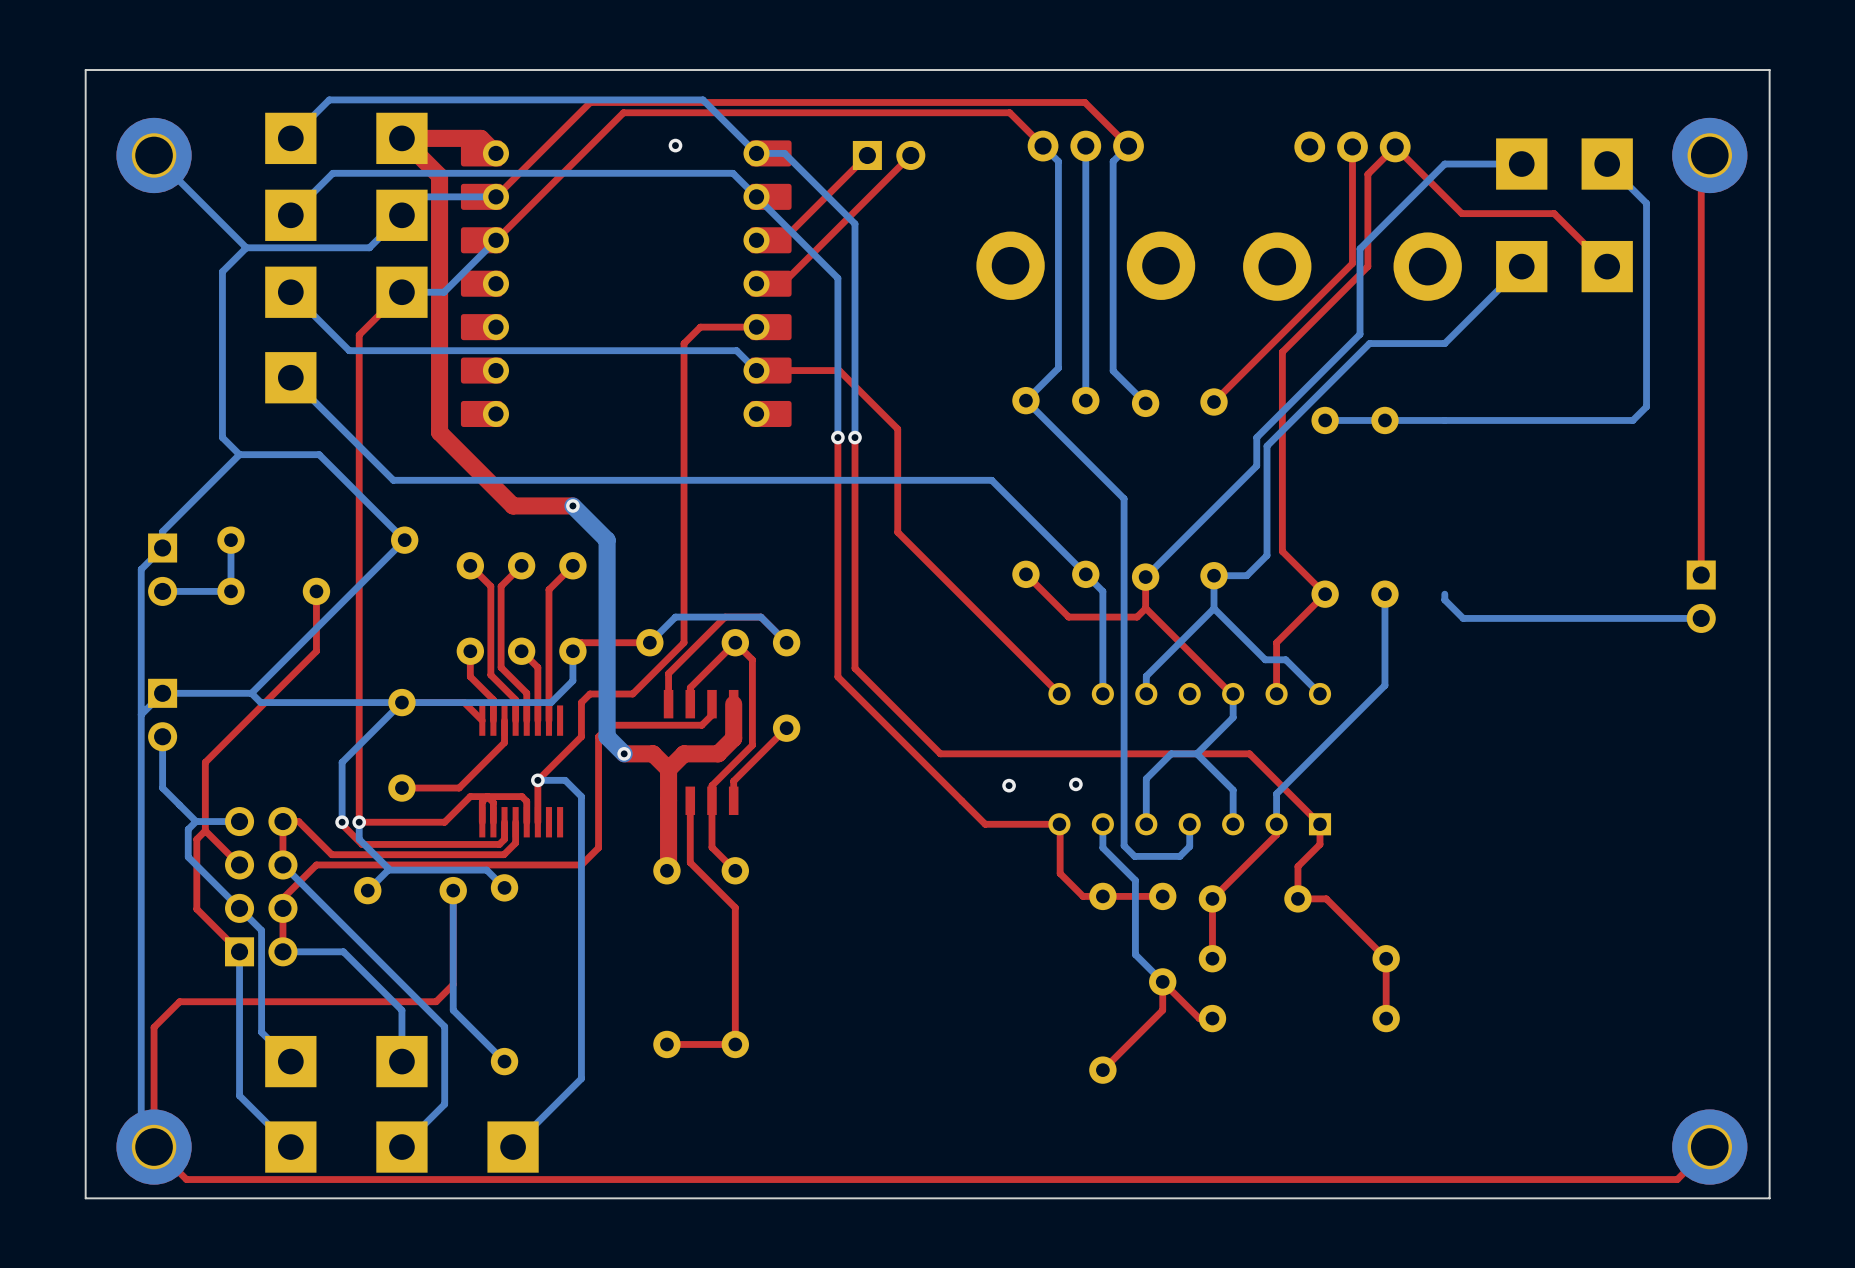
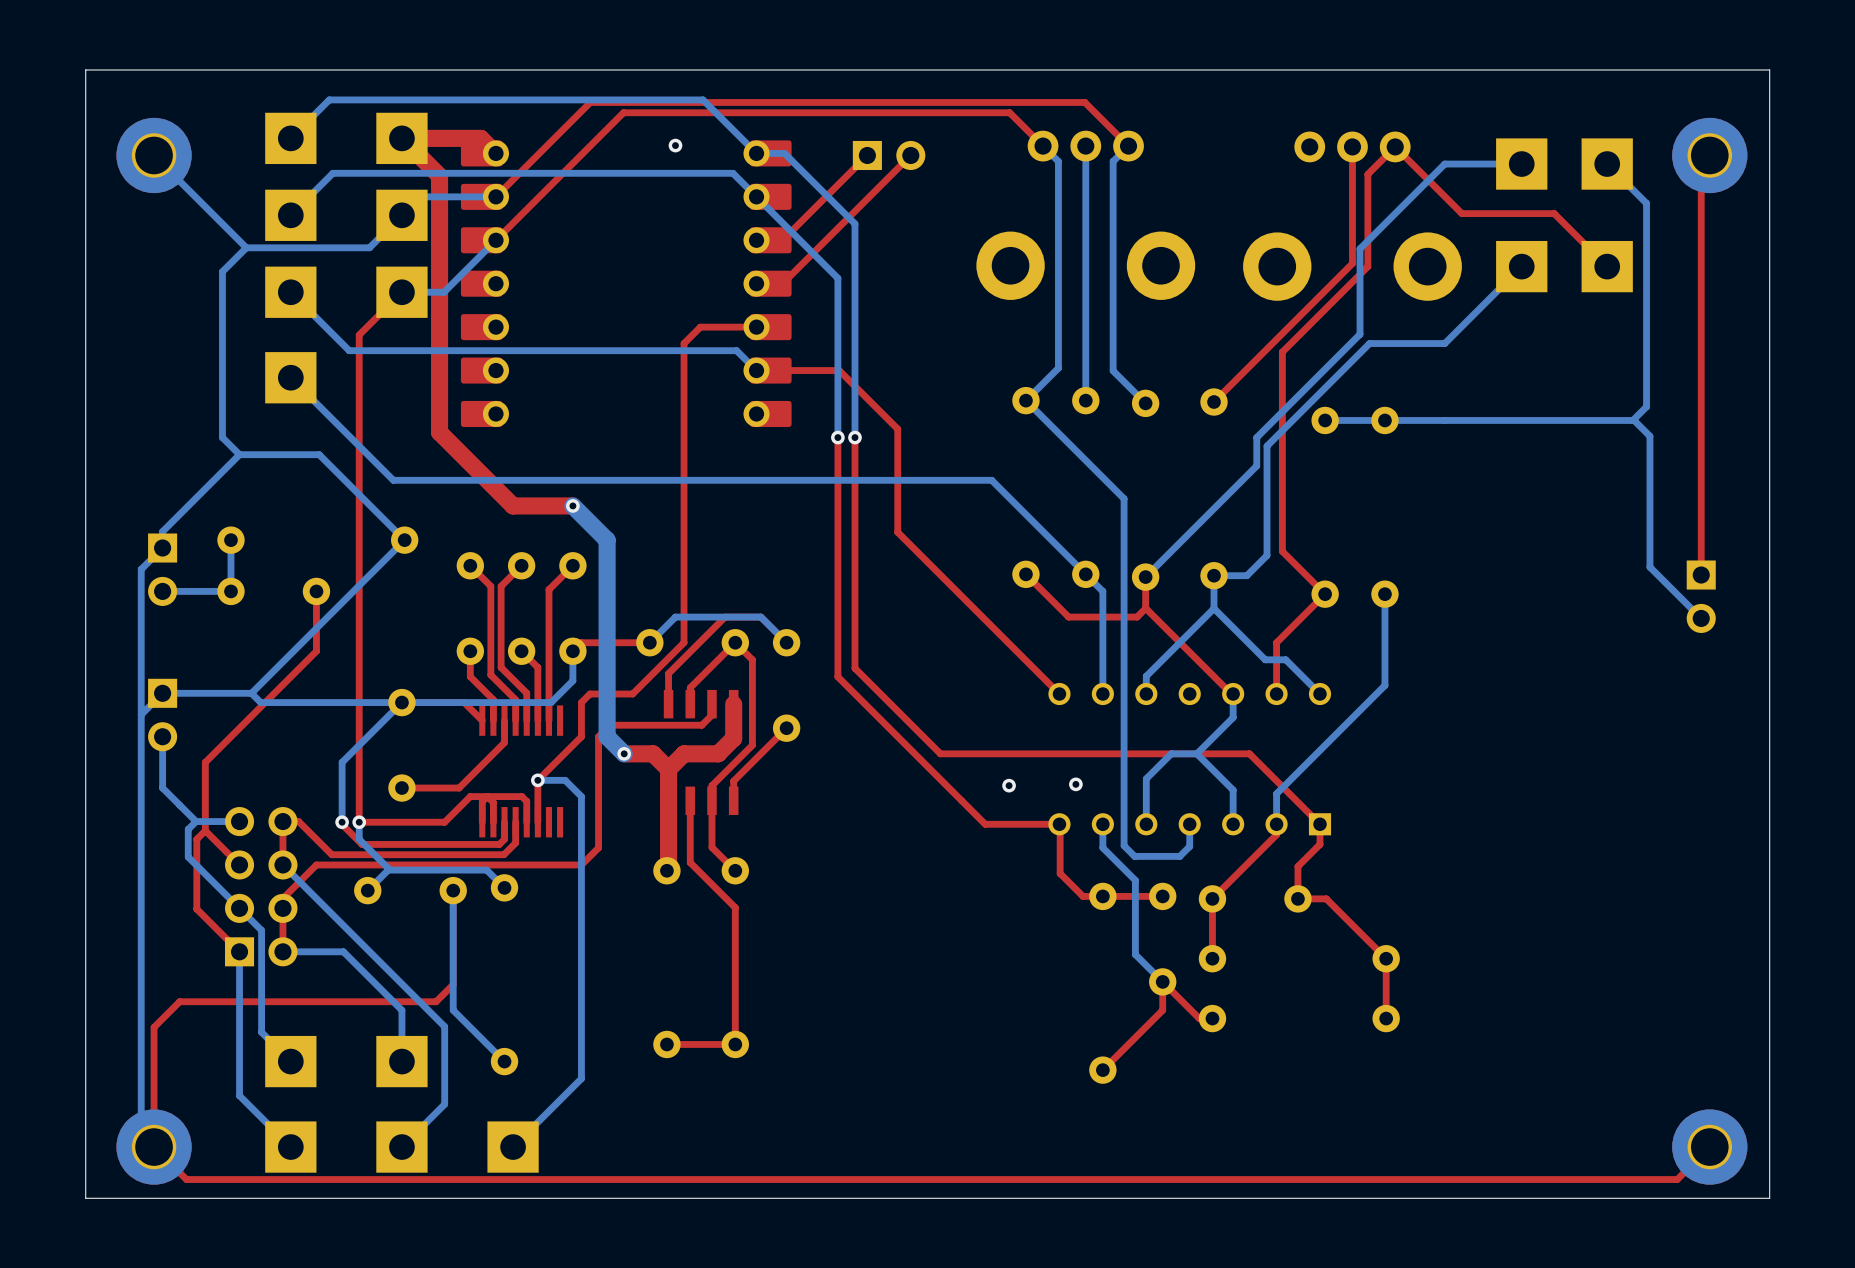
bottom track: (1444, 594) (1444, 599) (1463, 618) (1701, 618) -> (1632, 420) (1649, 436) (1649, 567) (1701, 618)

